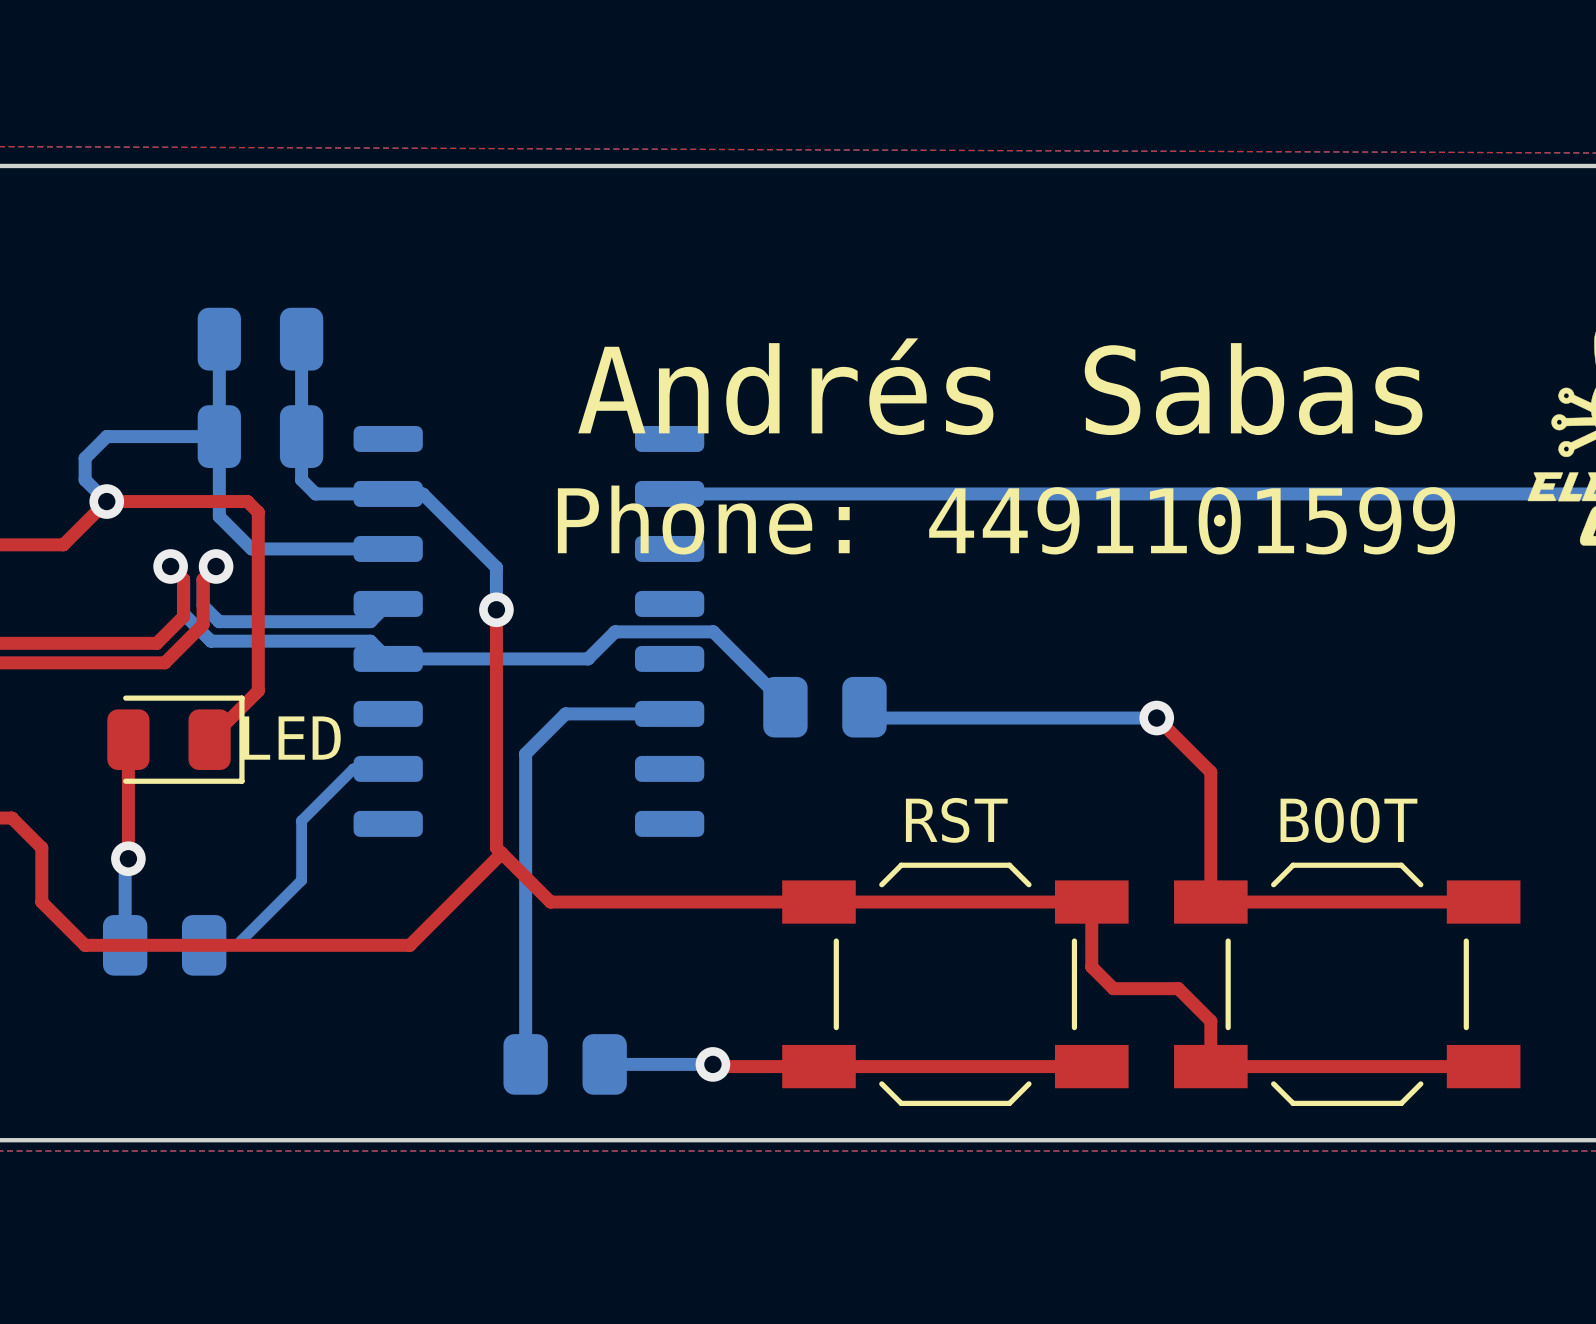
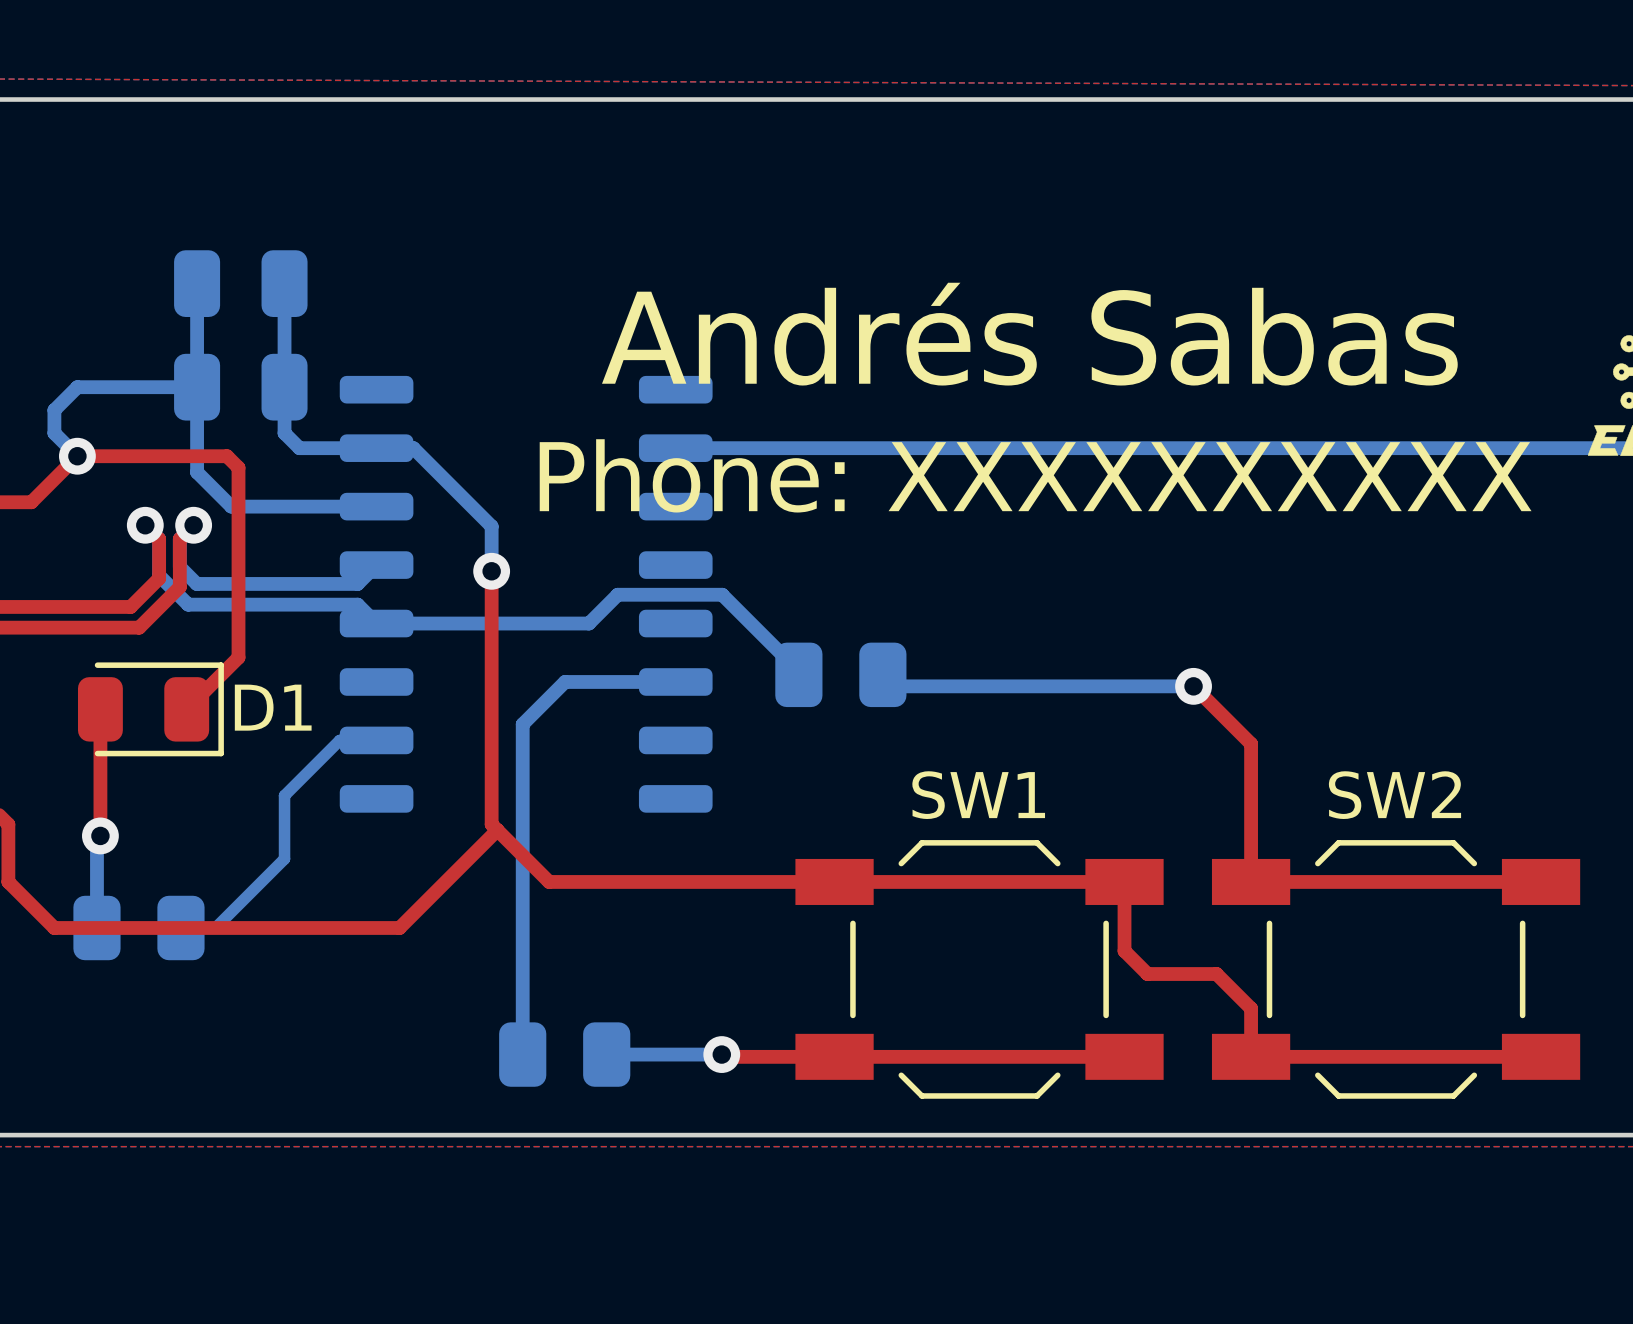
text: Phone: 4491101599 (1006, 520) -> Phone: XXXXXXXXXX (1035, 475)
LED name: LED (292, 738) -> D1 (273, 707)
RST name: RST (956, 820) -> SW1 (978, 795)
BOOT name: BOOT (1348, 820) -> SW2 (1394, 795)

